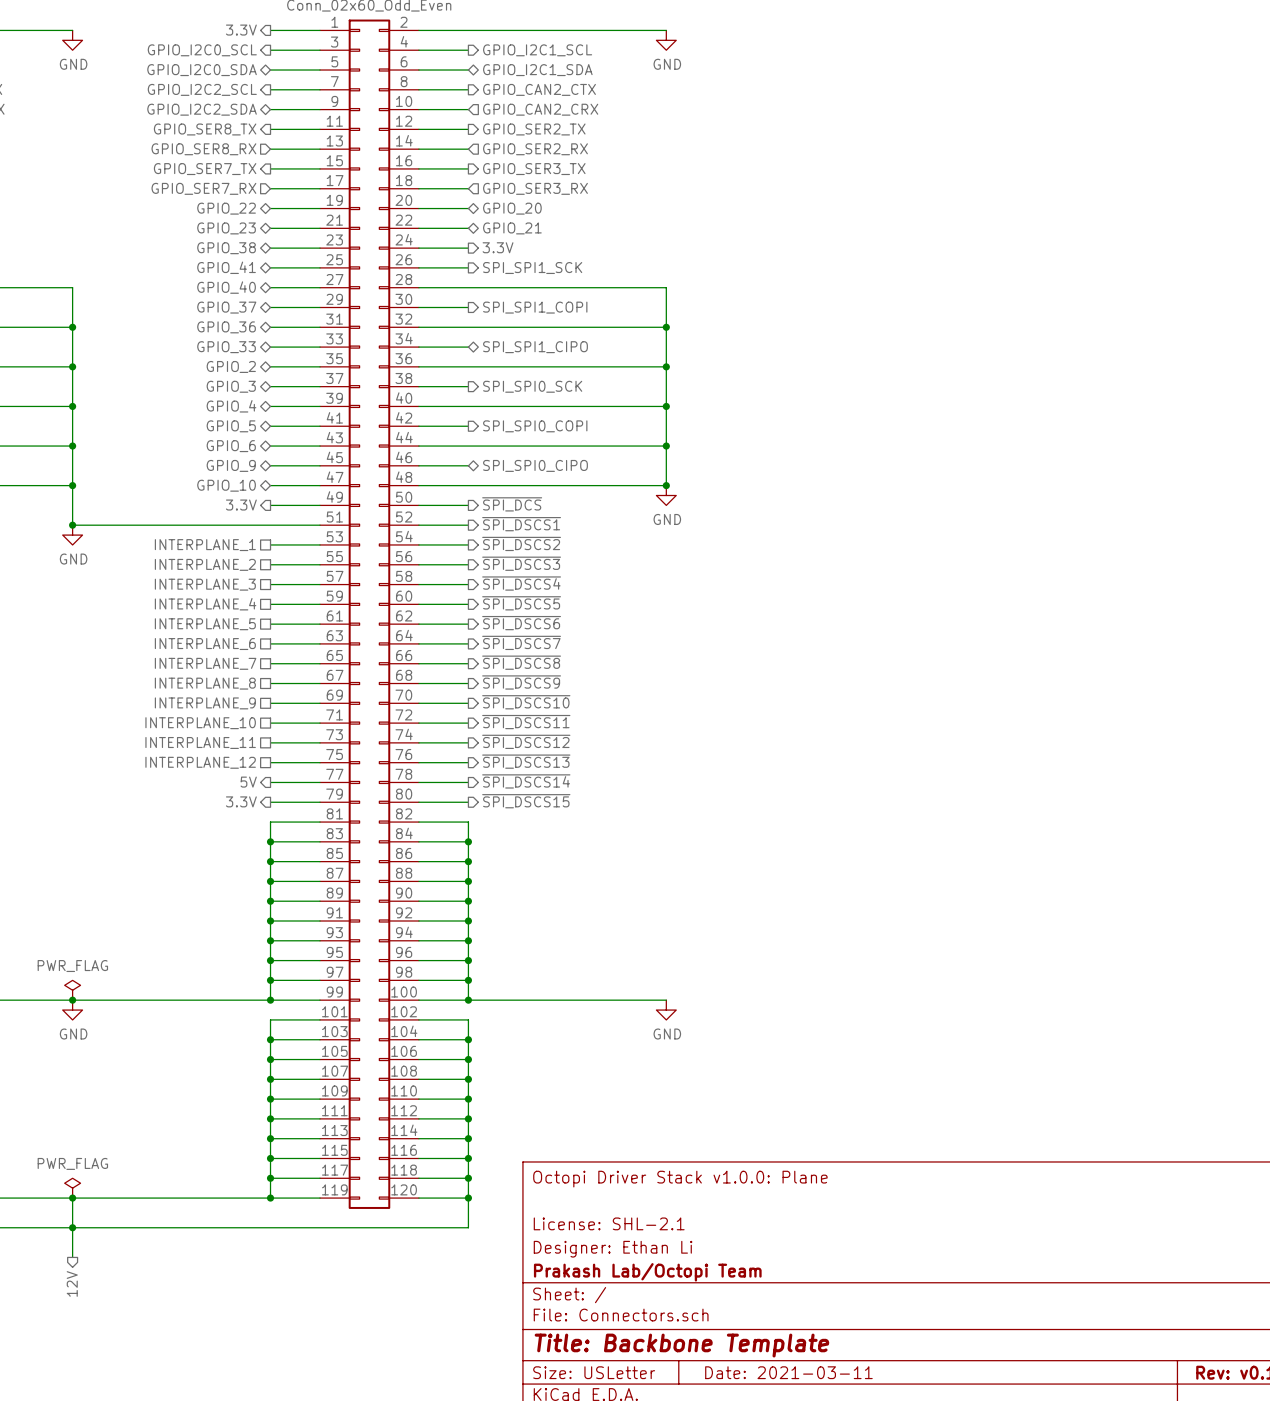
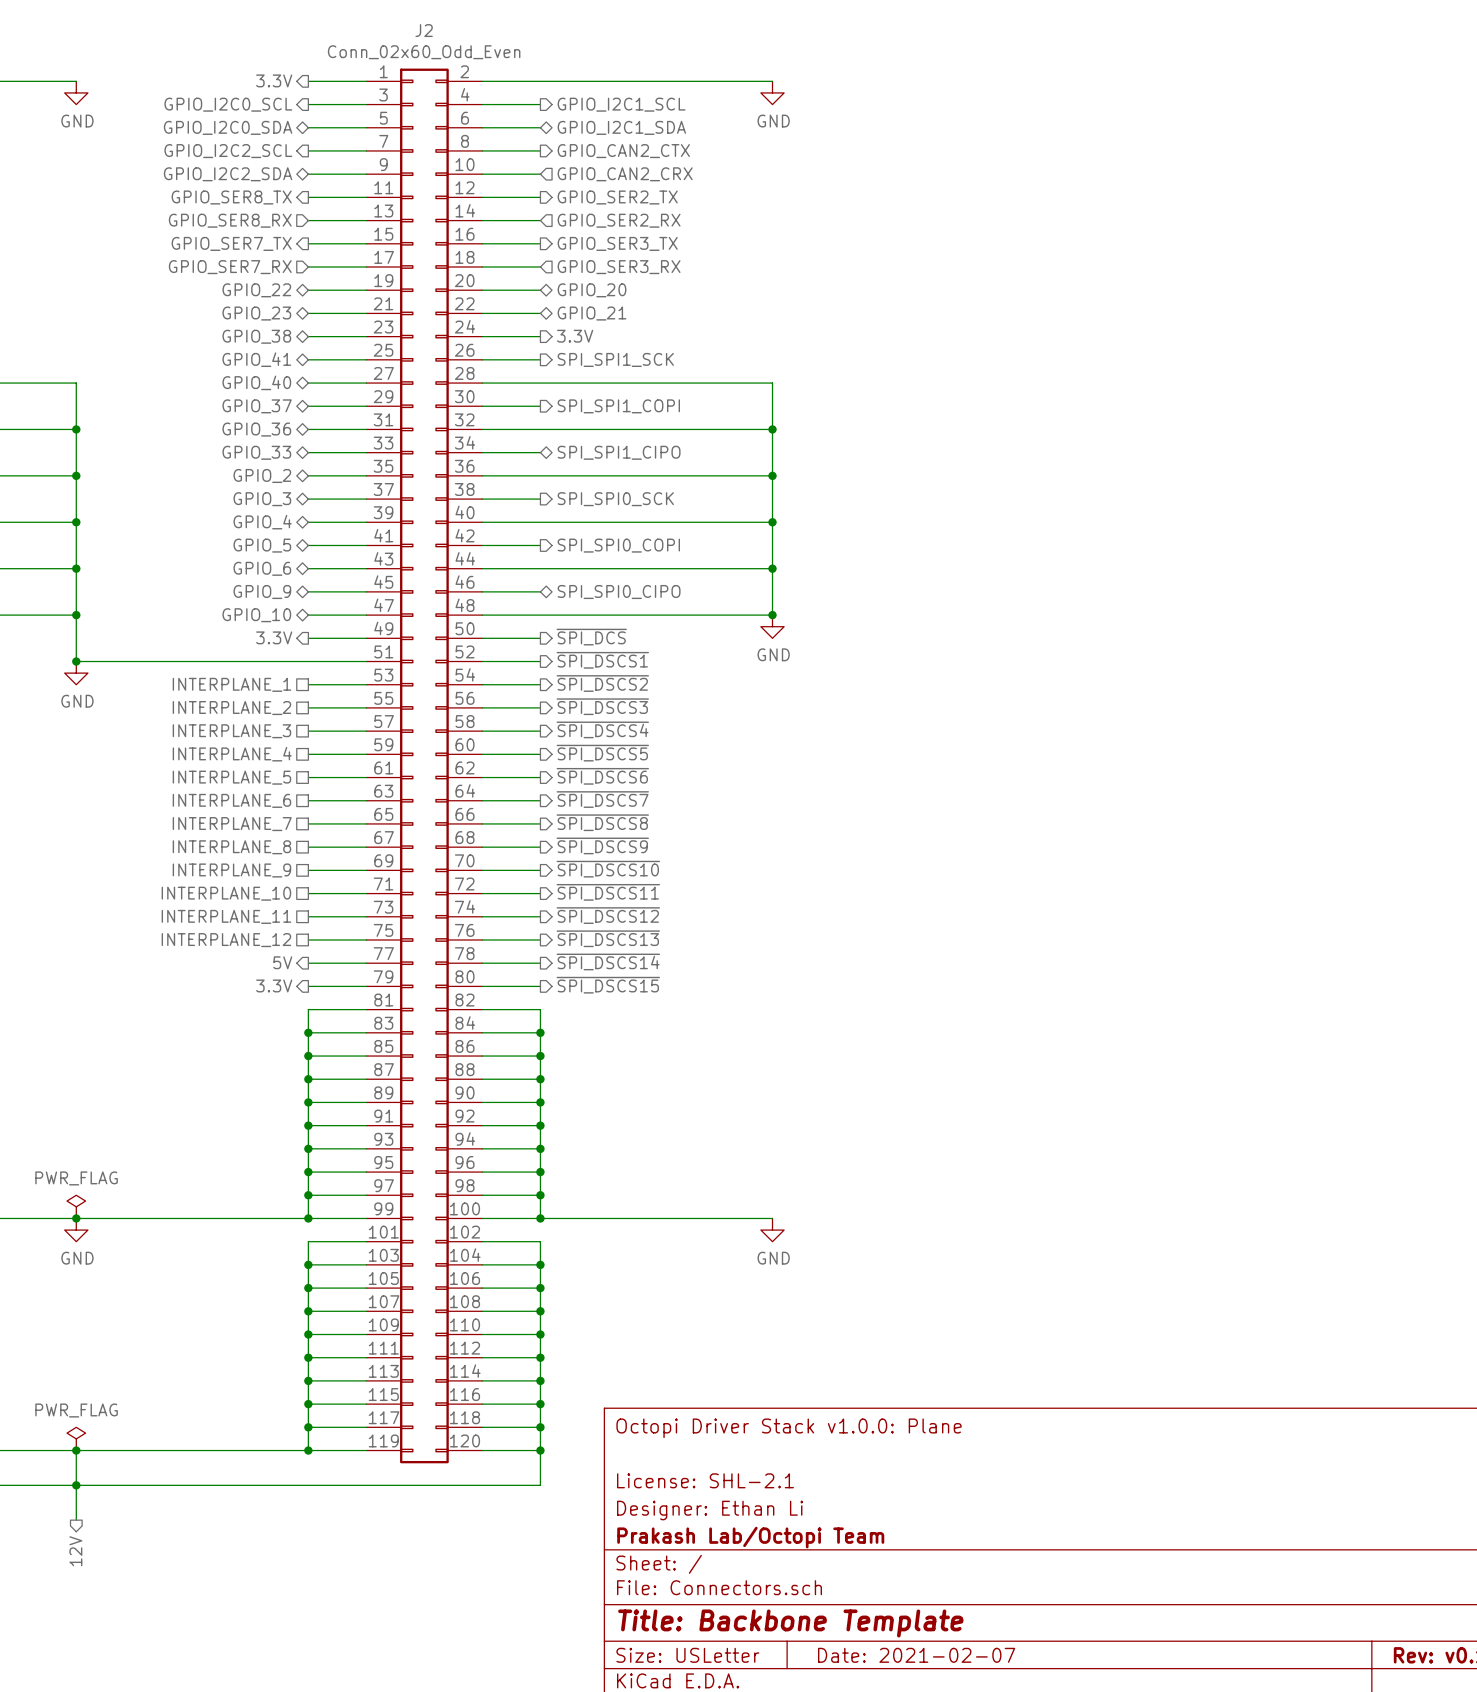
title block: Date: 2021-03-11 (788, 1372) -> Date: 2021-02-07 (916, 1655)

